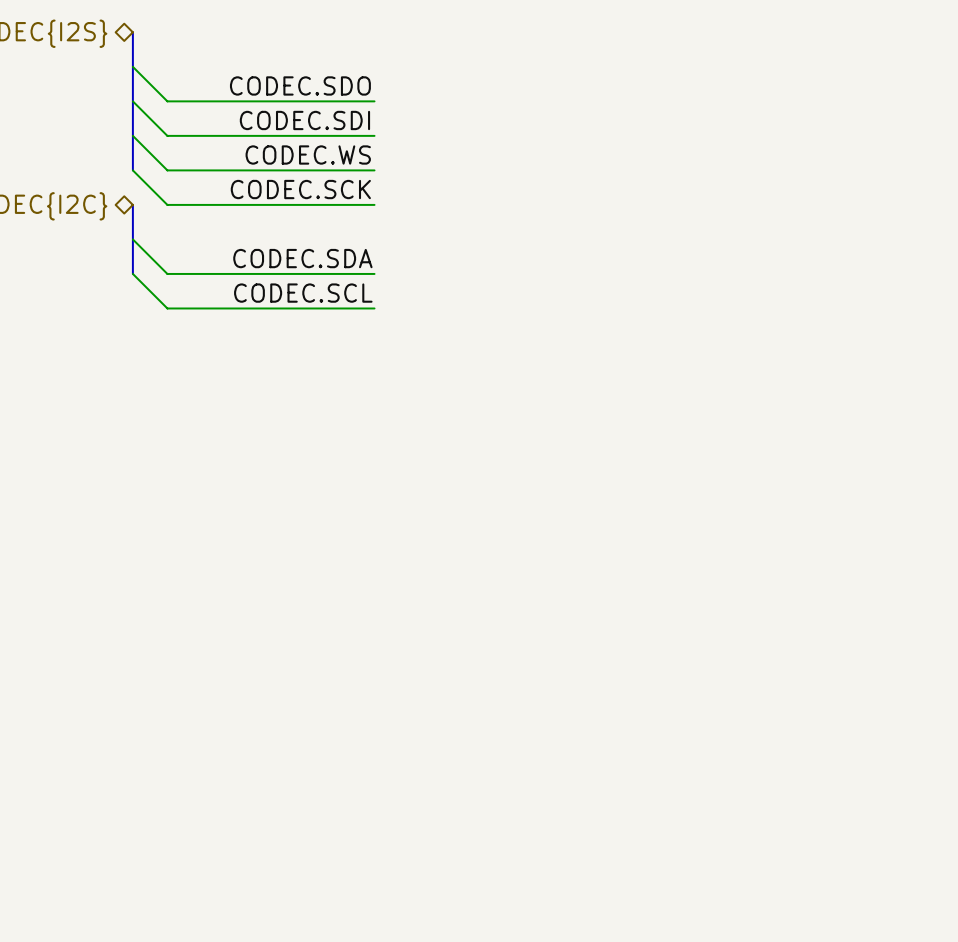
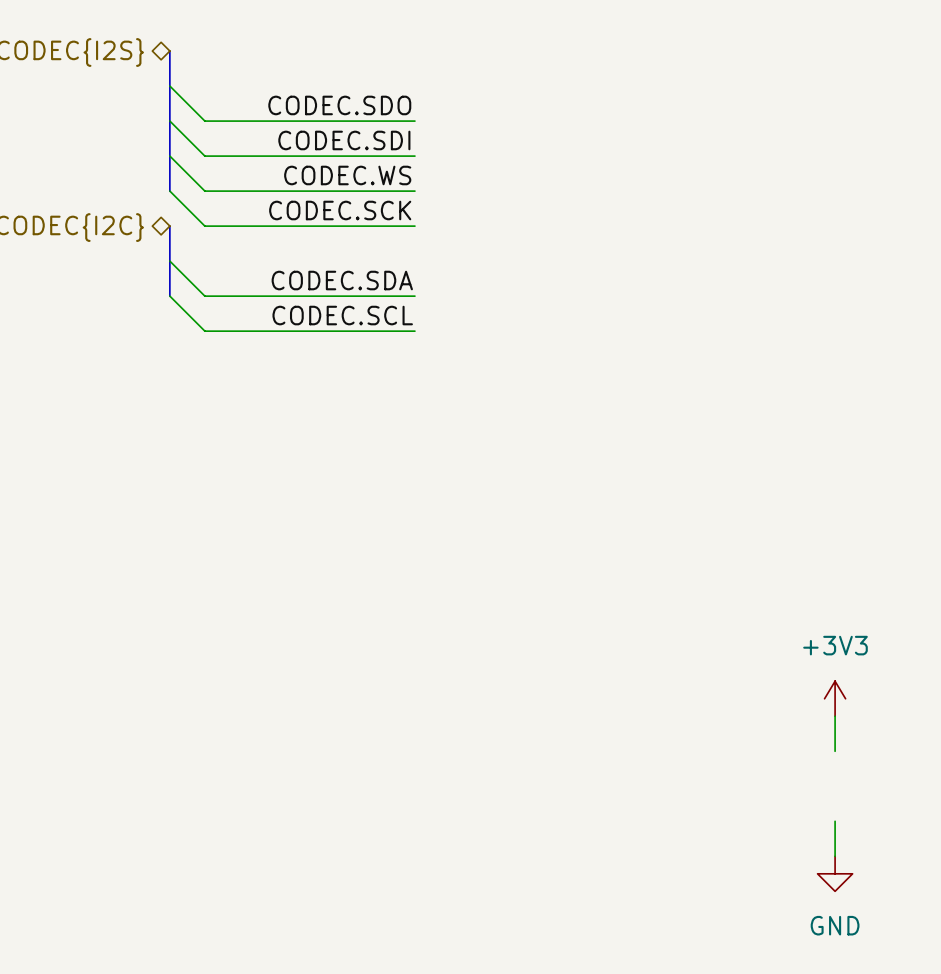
power symbol: none -> +3V3 (835, 698)
wire: none -> (835, 716) (835, 751)
wire: none -> (835, 821) (835, 856)
power symbol: none -> GND (835, 873)

